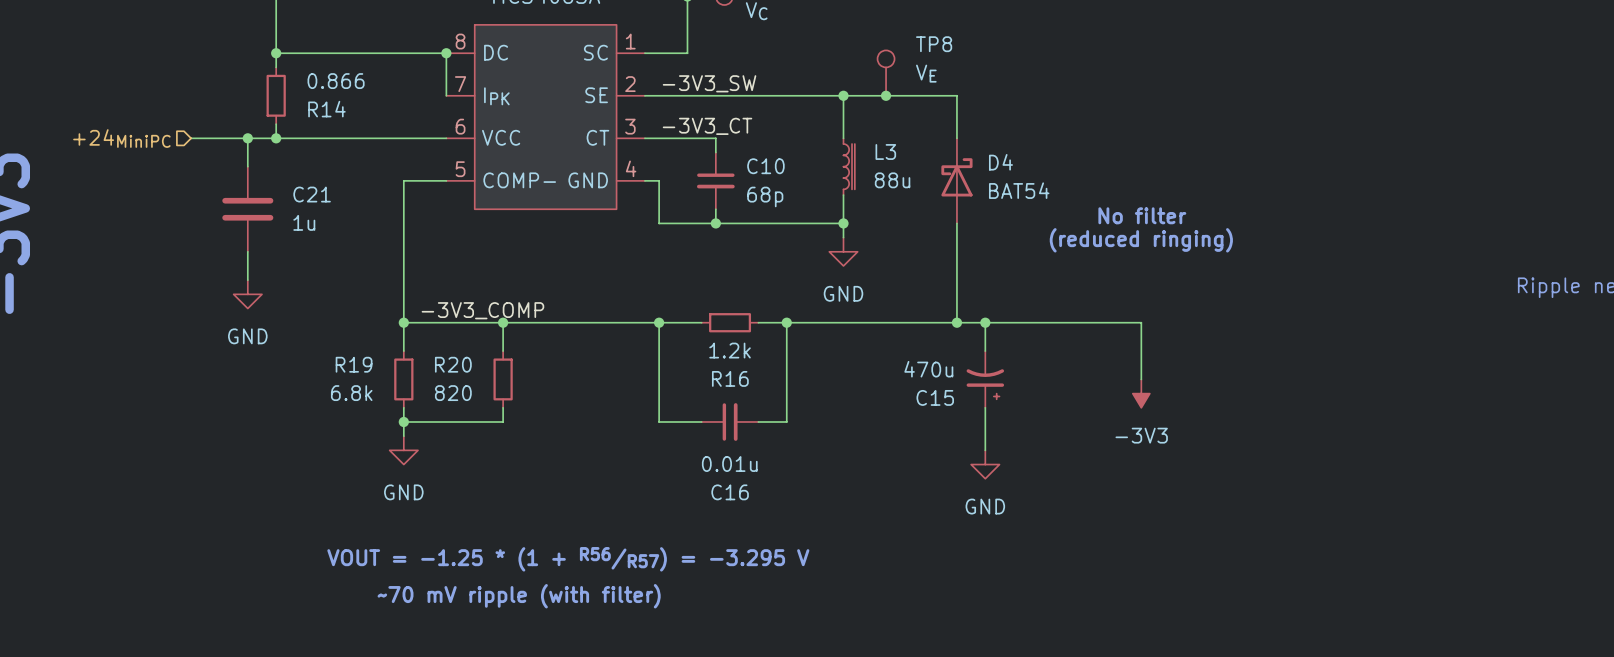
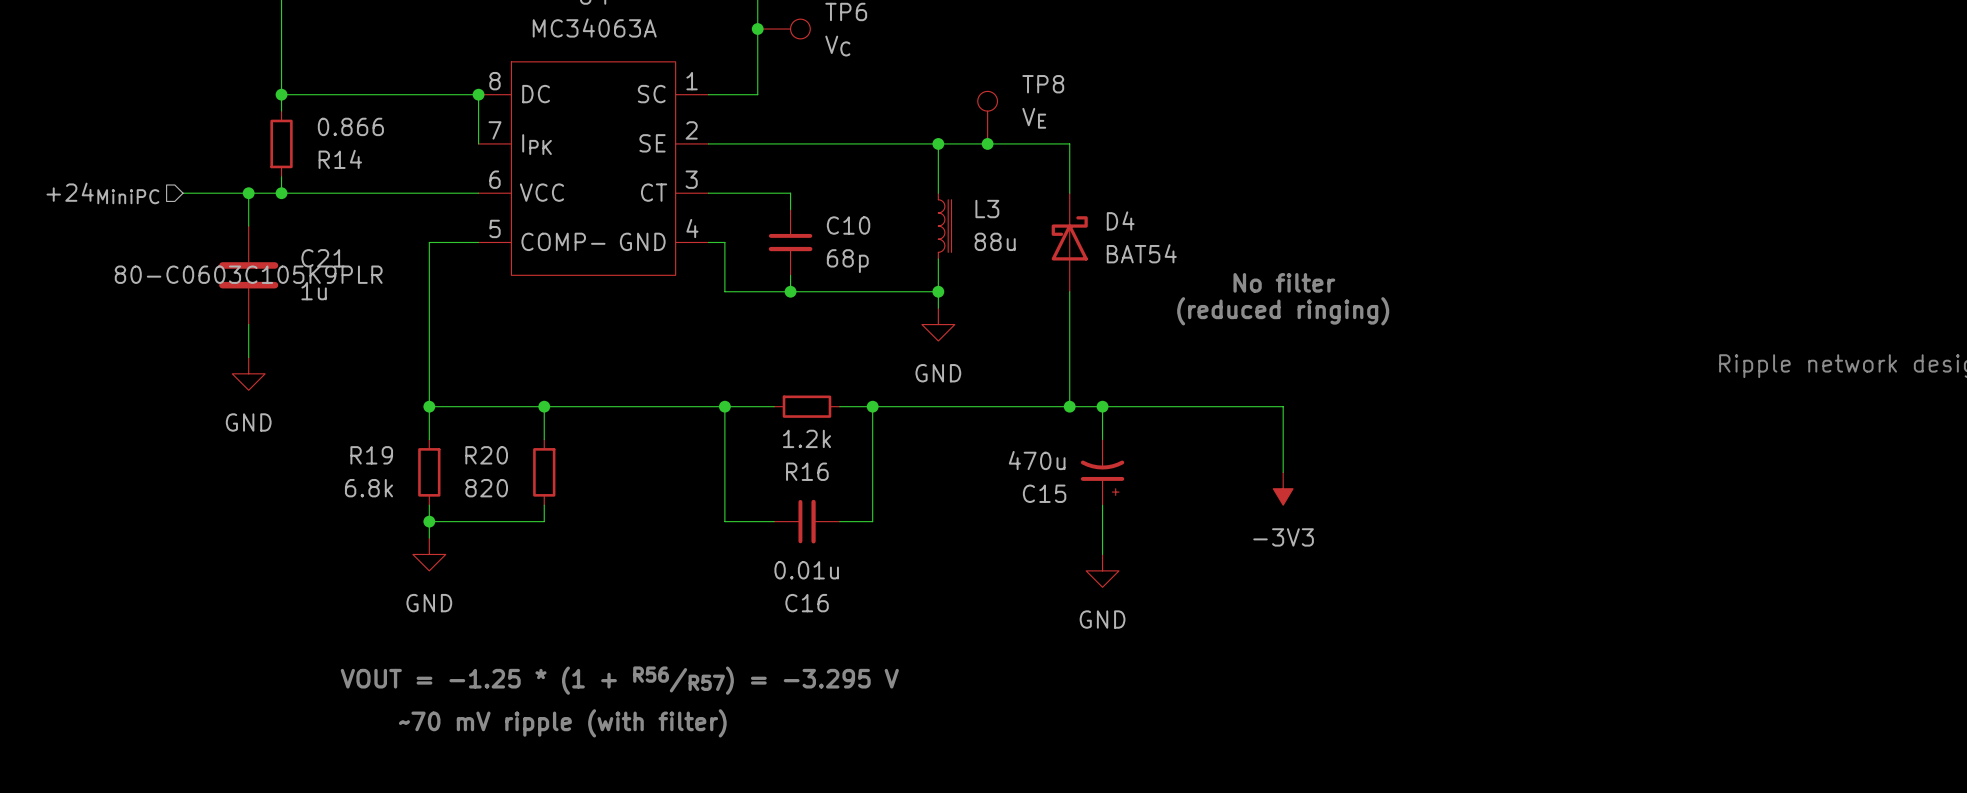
label: -3V3_SW (709, 83) -> none
label: -3V3_CT (707, 126) -> none
C21 text: none -> 80-C0603C105K9PLR (248, 274)
label: -3V3_COMP (482, 310) -> none

